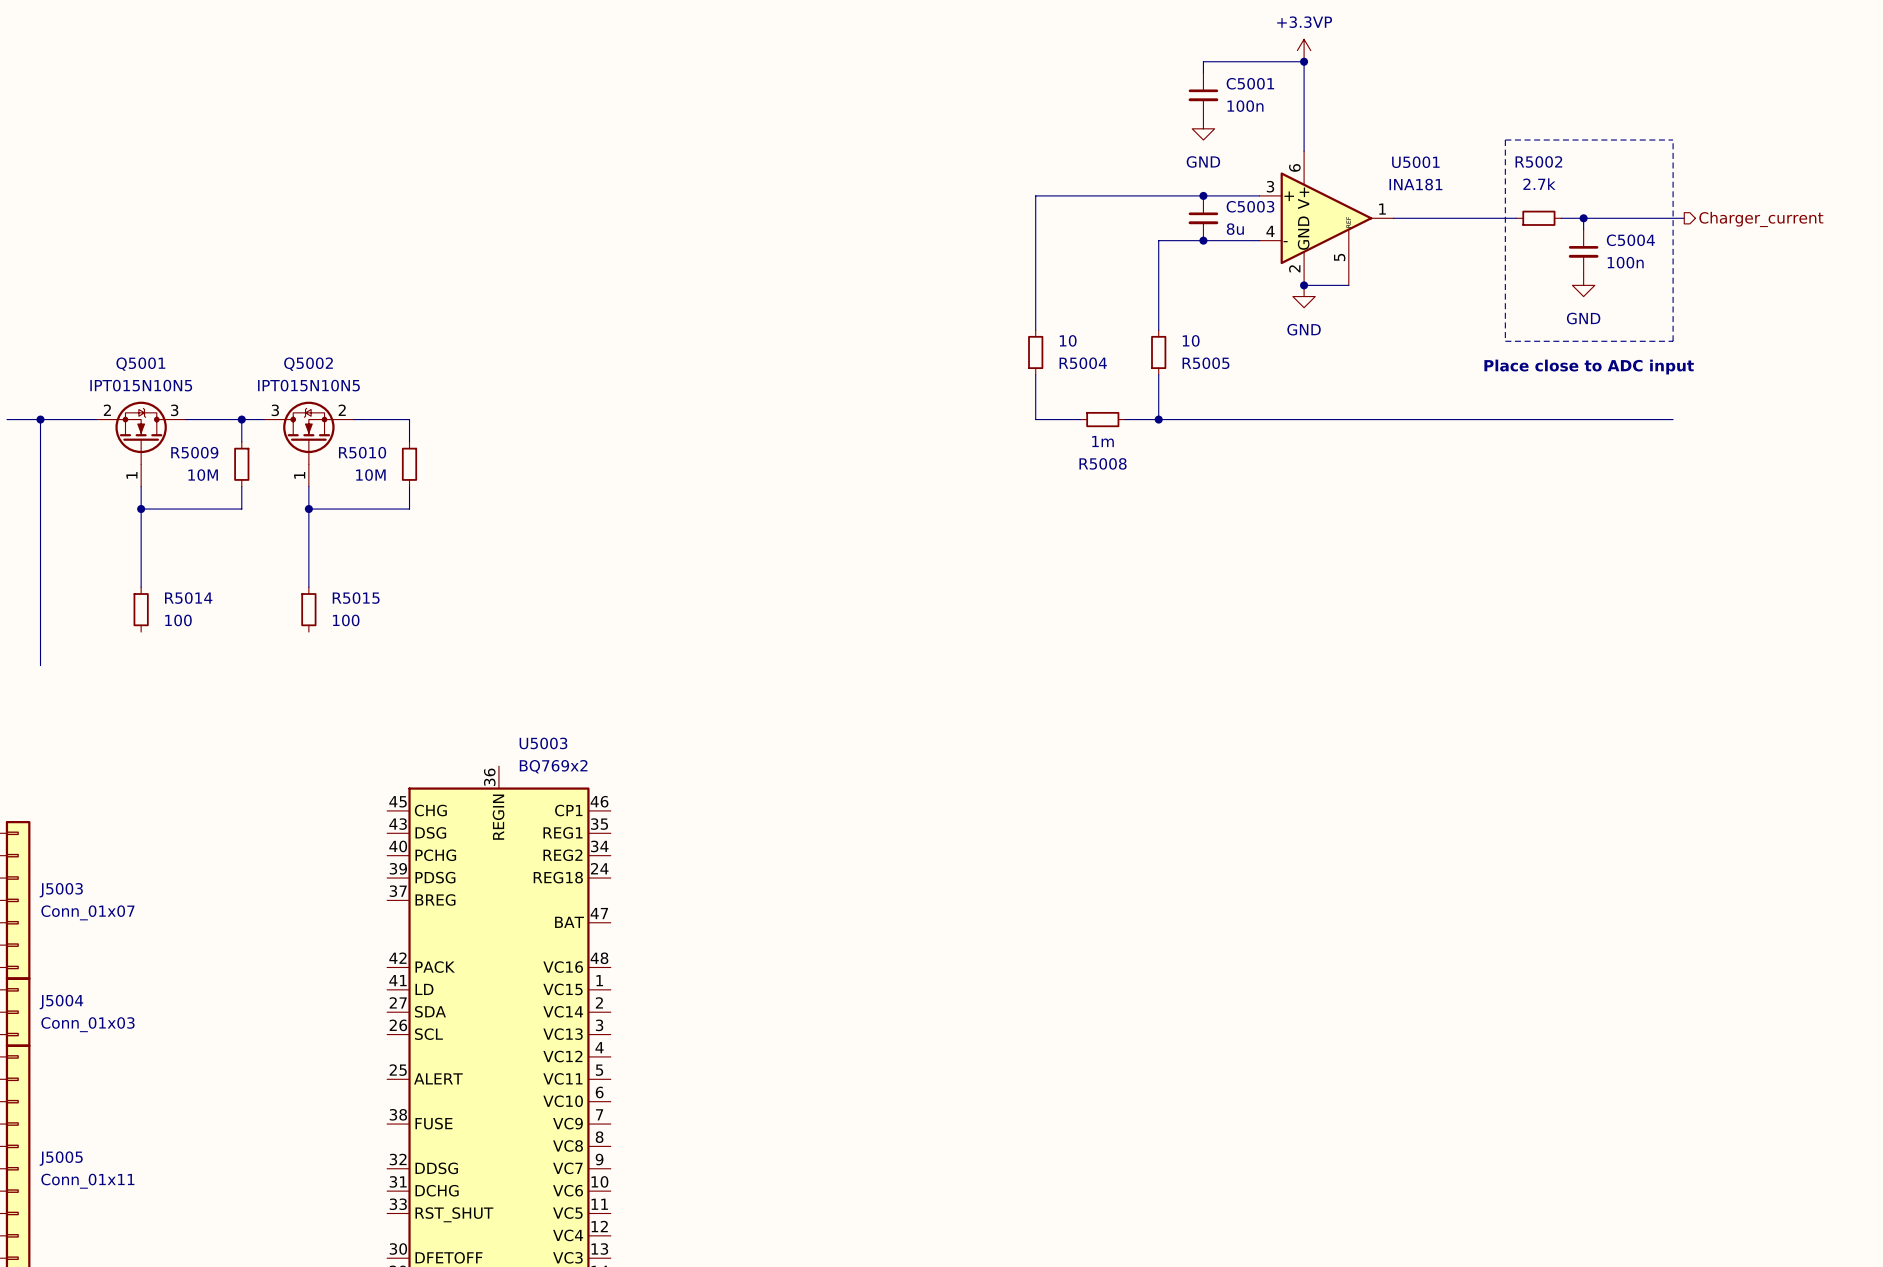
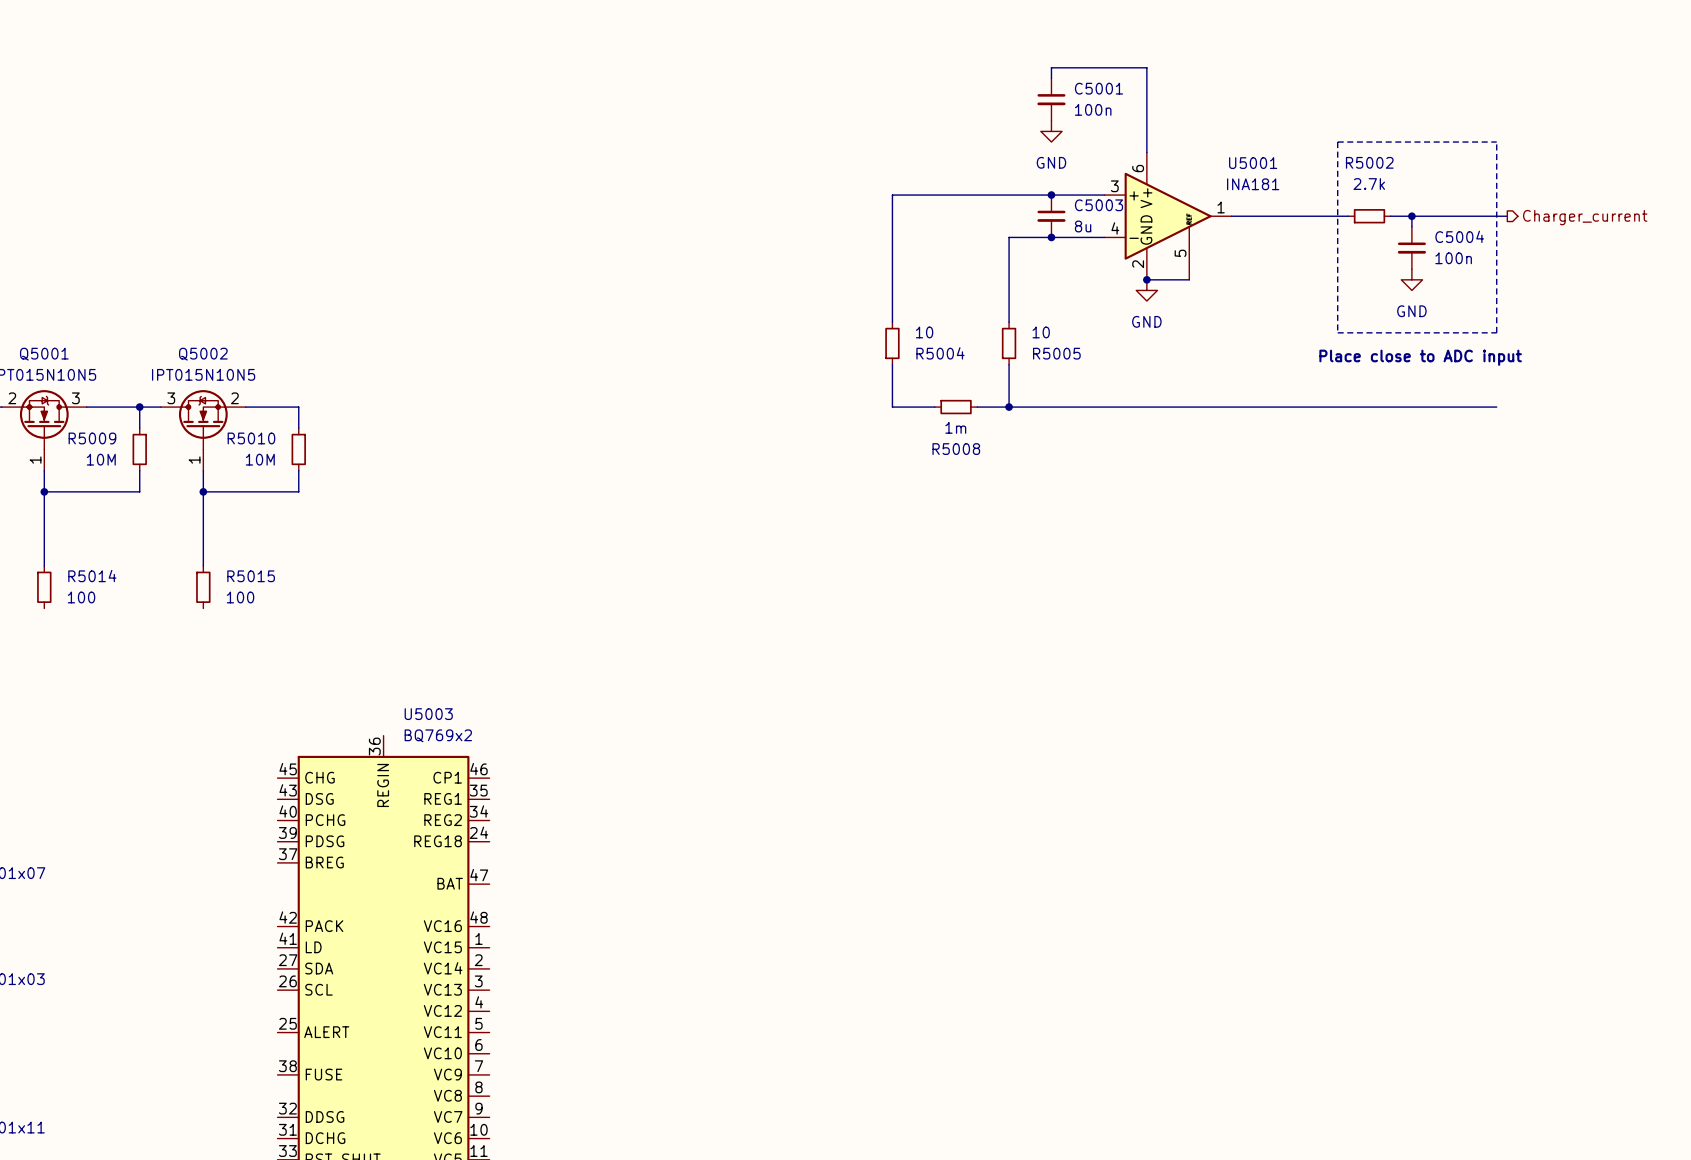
power symbol: +3.3VP (1304, 50) -> none
junction: (1304, 61) -> none

